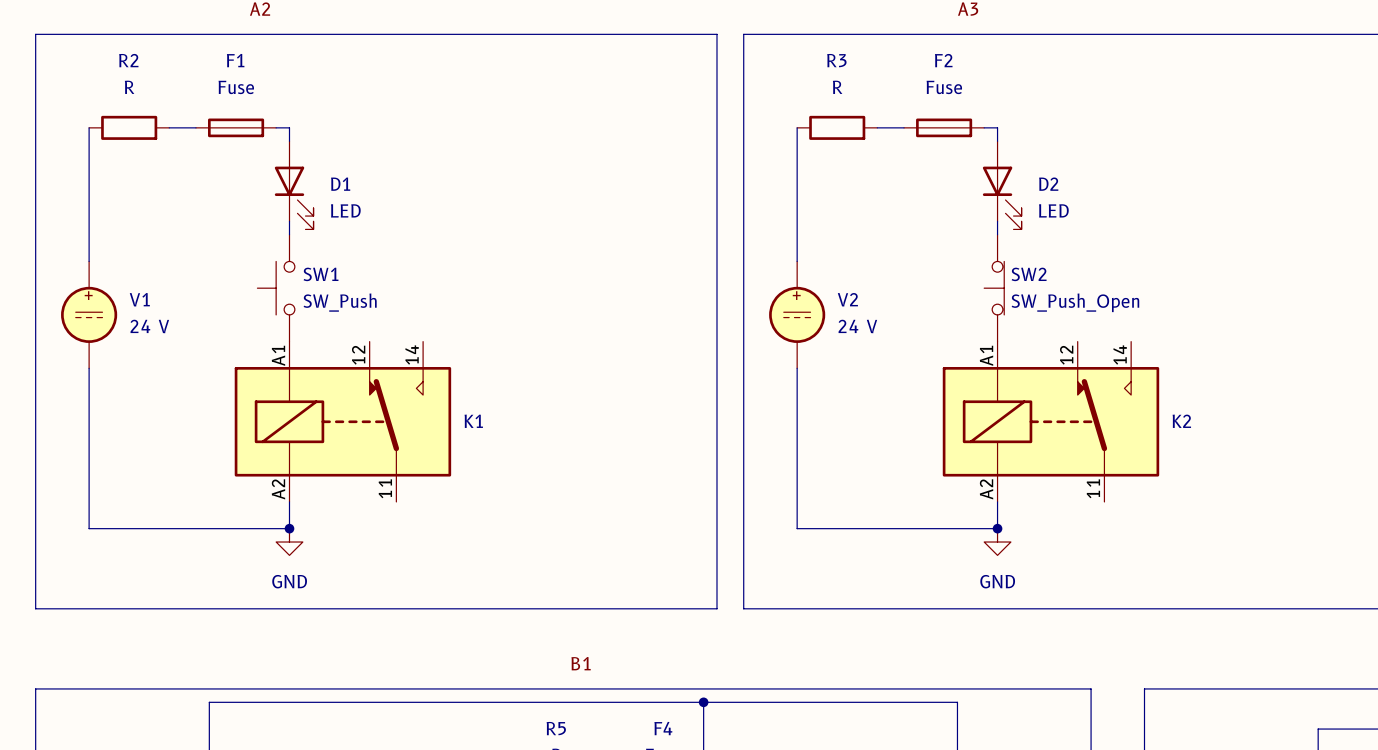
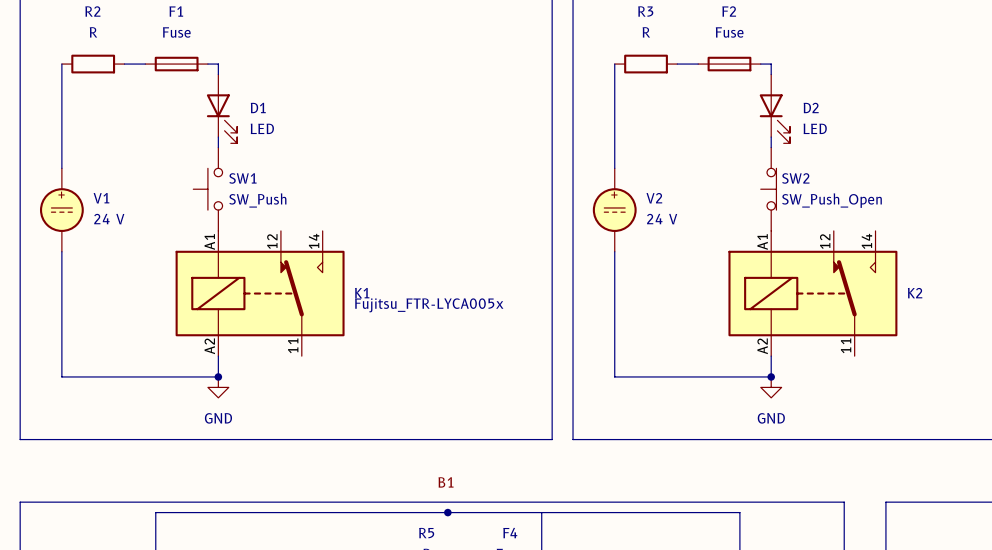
K1 value: none -> Fujitsu_FTR-LYCA005x (429, 305)
junction: none -> (447, 512)
junction: (703, 702) -> none

